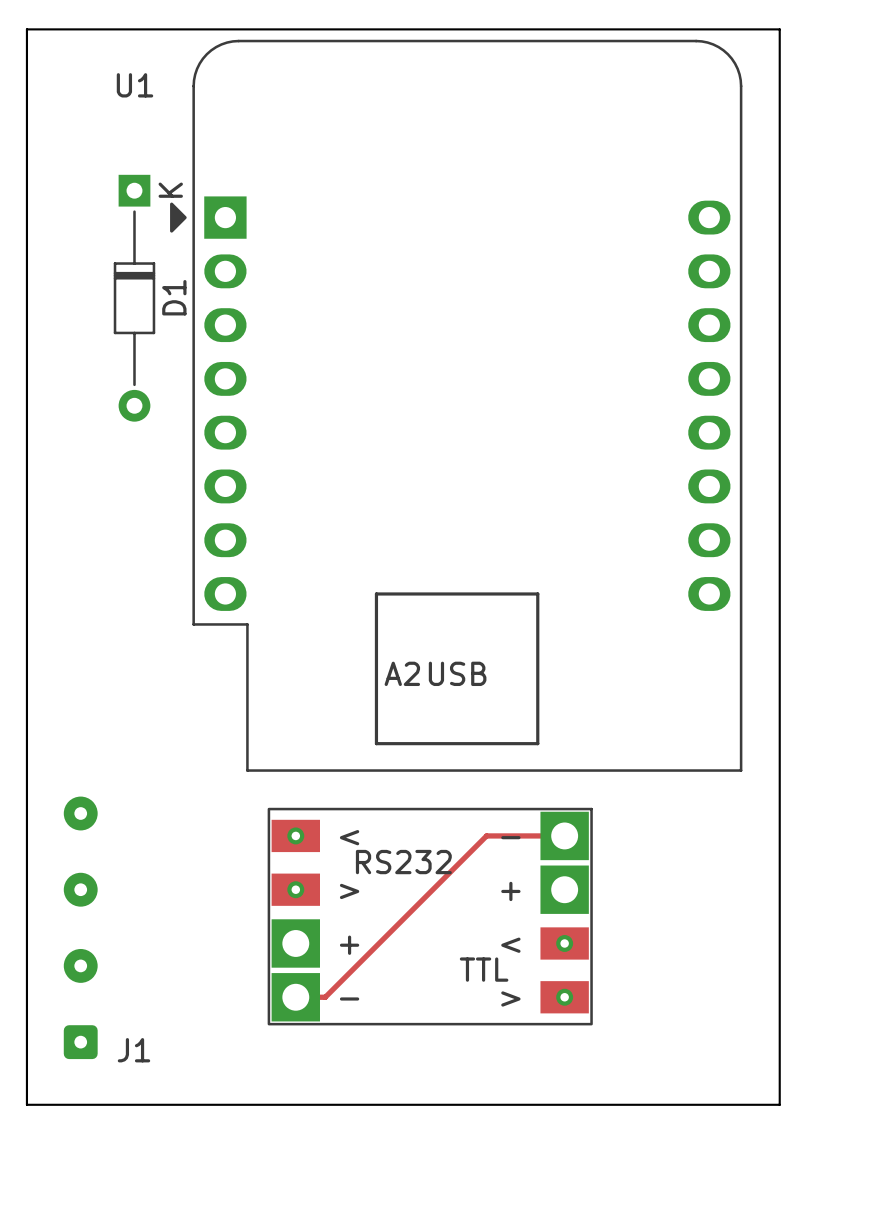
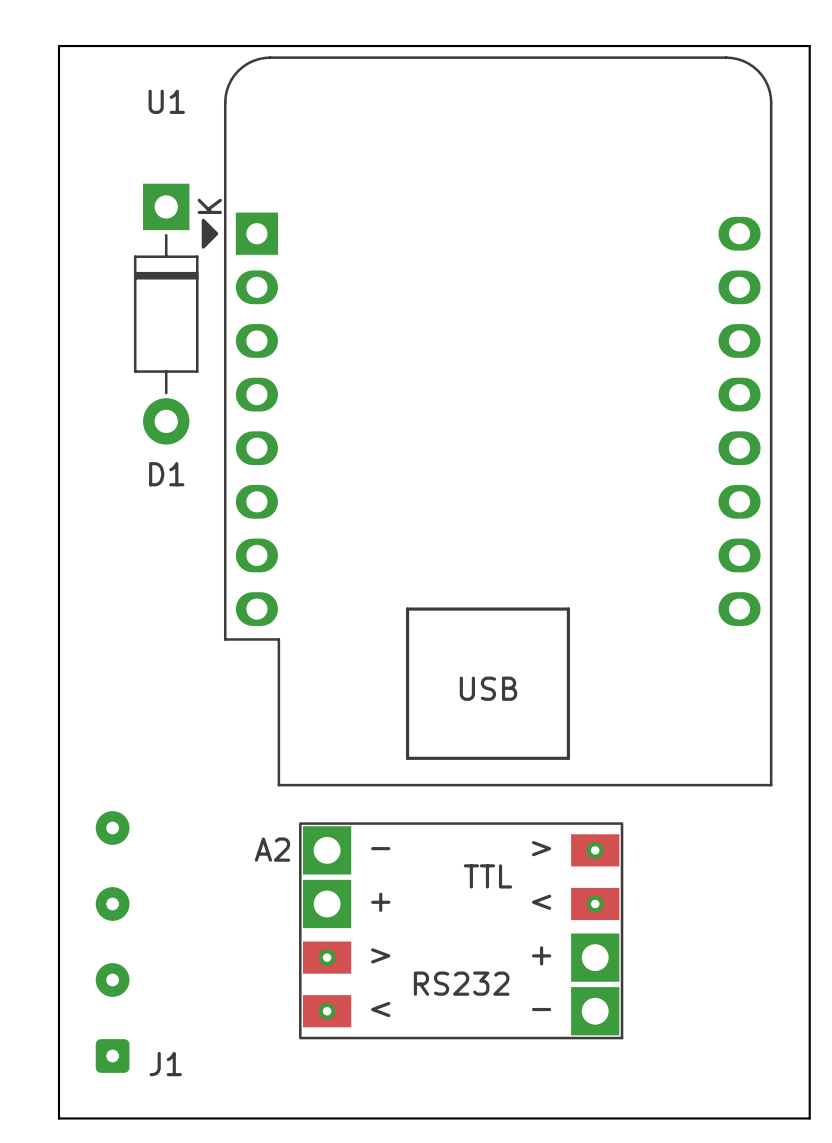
D1 footprint: [113, 174, 156, 422] -> [133, 183, 199, 445]
D1 name position: D1 (174, 297) -> D1 (166, 474)
A2 name position: A2 (402, 673) -> A2 (272, 849)
A2 footprint: [267, 807, 593, 1026] -> [299, 822, 624, 1040]
via: (295, 835) -> none
track: (564, 835) (486, 835) (325, 997) (295, 997) -> none
via: none -> (595, 850)
via: (295, 889) -> none
via: none -> (595, 903)
via: none -> (327, 957)
via: (564, 943) -> none
via: none -> (327, 1011)
via: (564, 997) -> none

